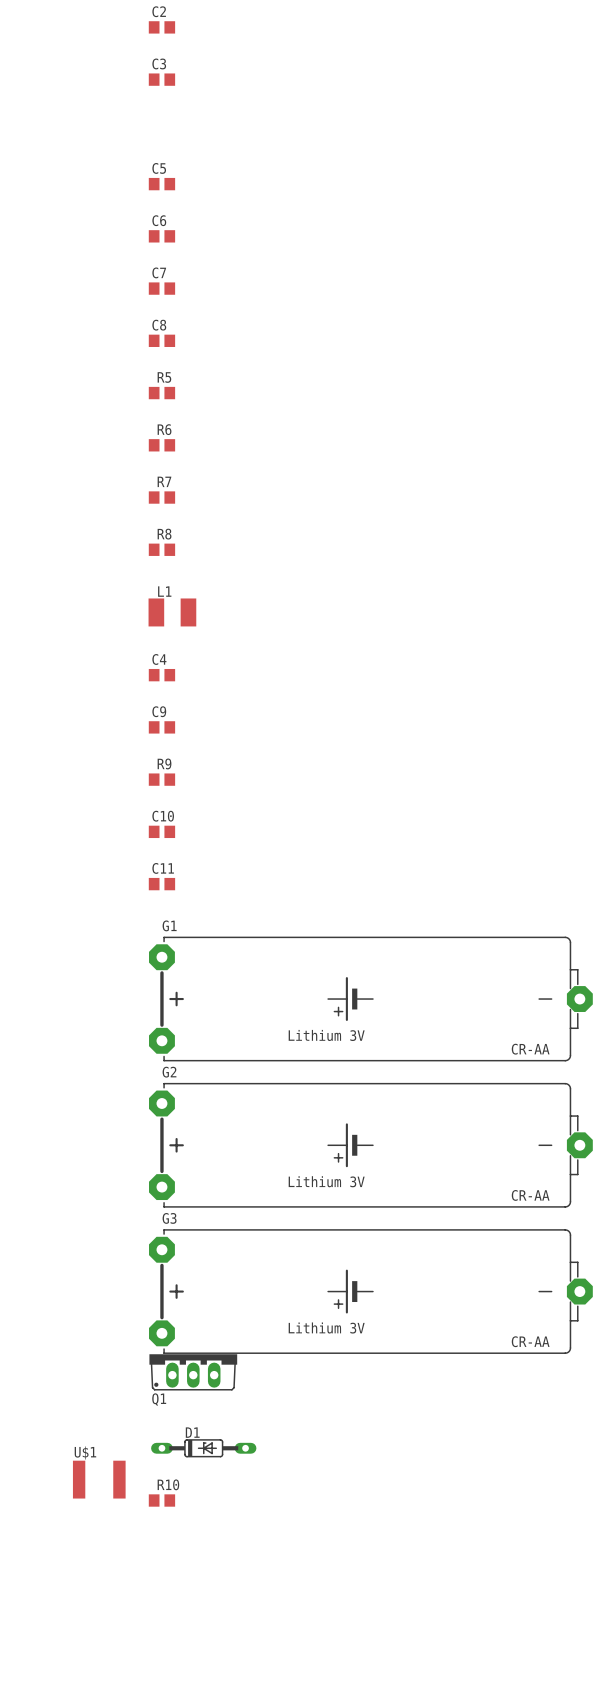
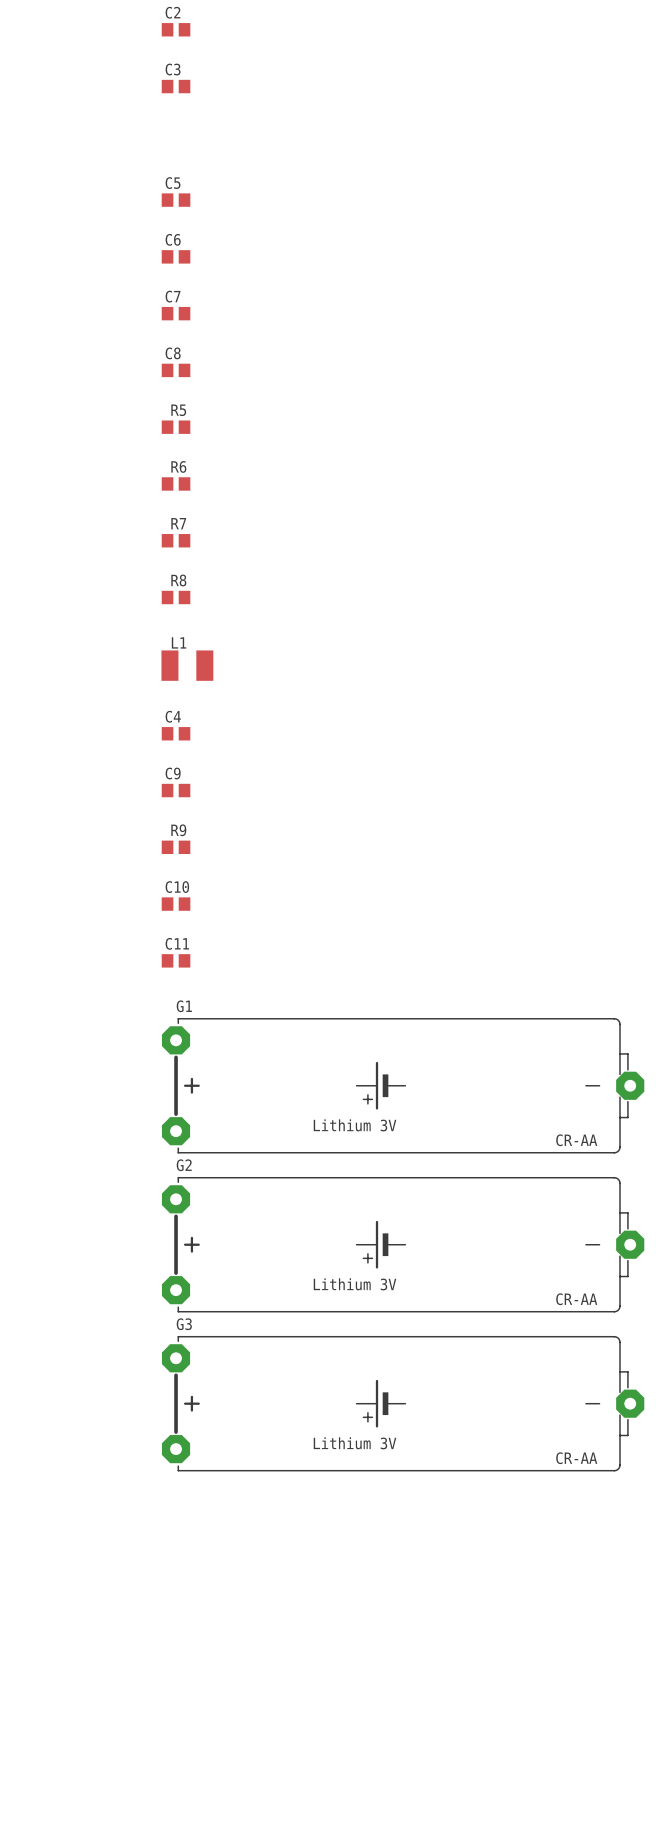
Q1: (193, 1372) -> none
D1: (203, 1448) -> none
U$1: (99, 1479) -> none
R10: (161, 1500) -> none

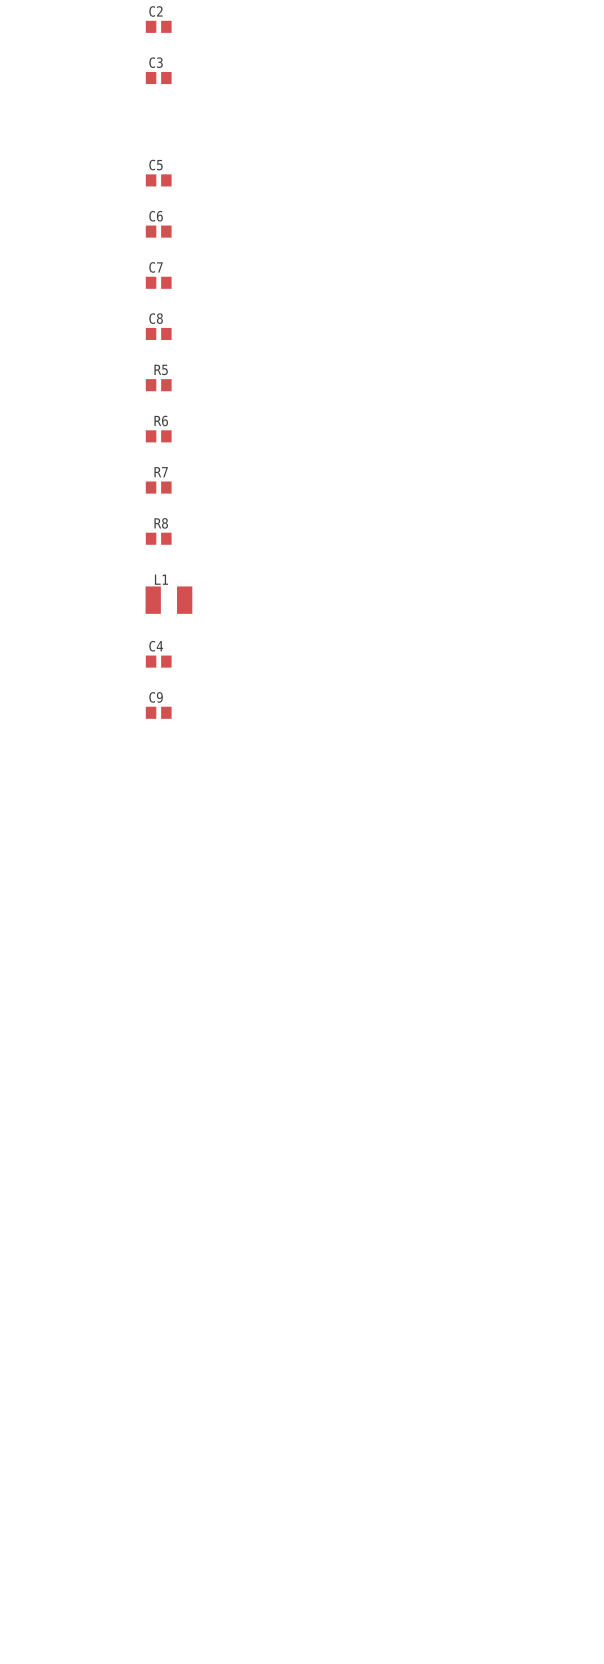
R9: (176, 847) -> none
C10: (176, 904) -> none
C11: (176, 960) -> none
G1: (403, 1085) -> none
G2: (403, 1244) -> none
G3: (403, 1403) -> none

